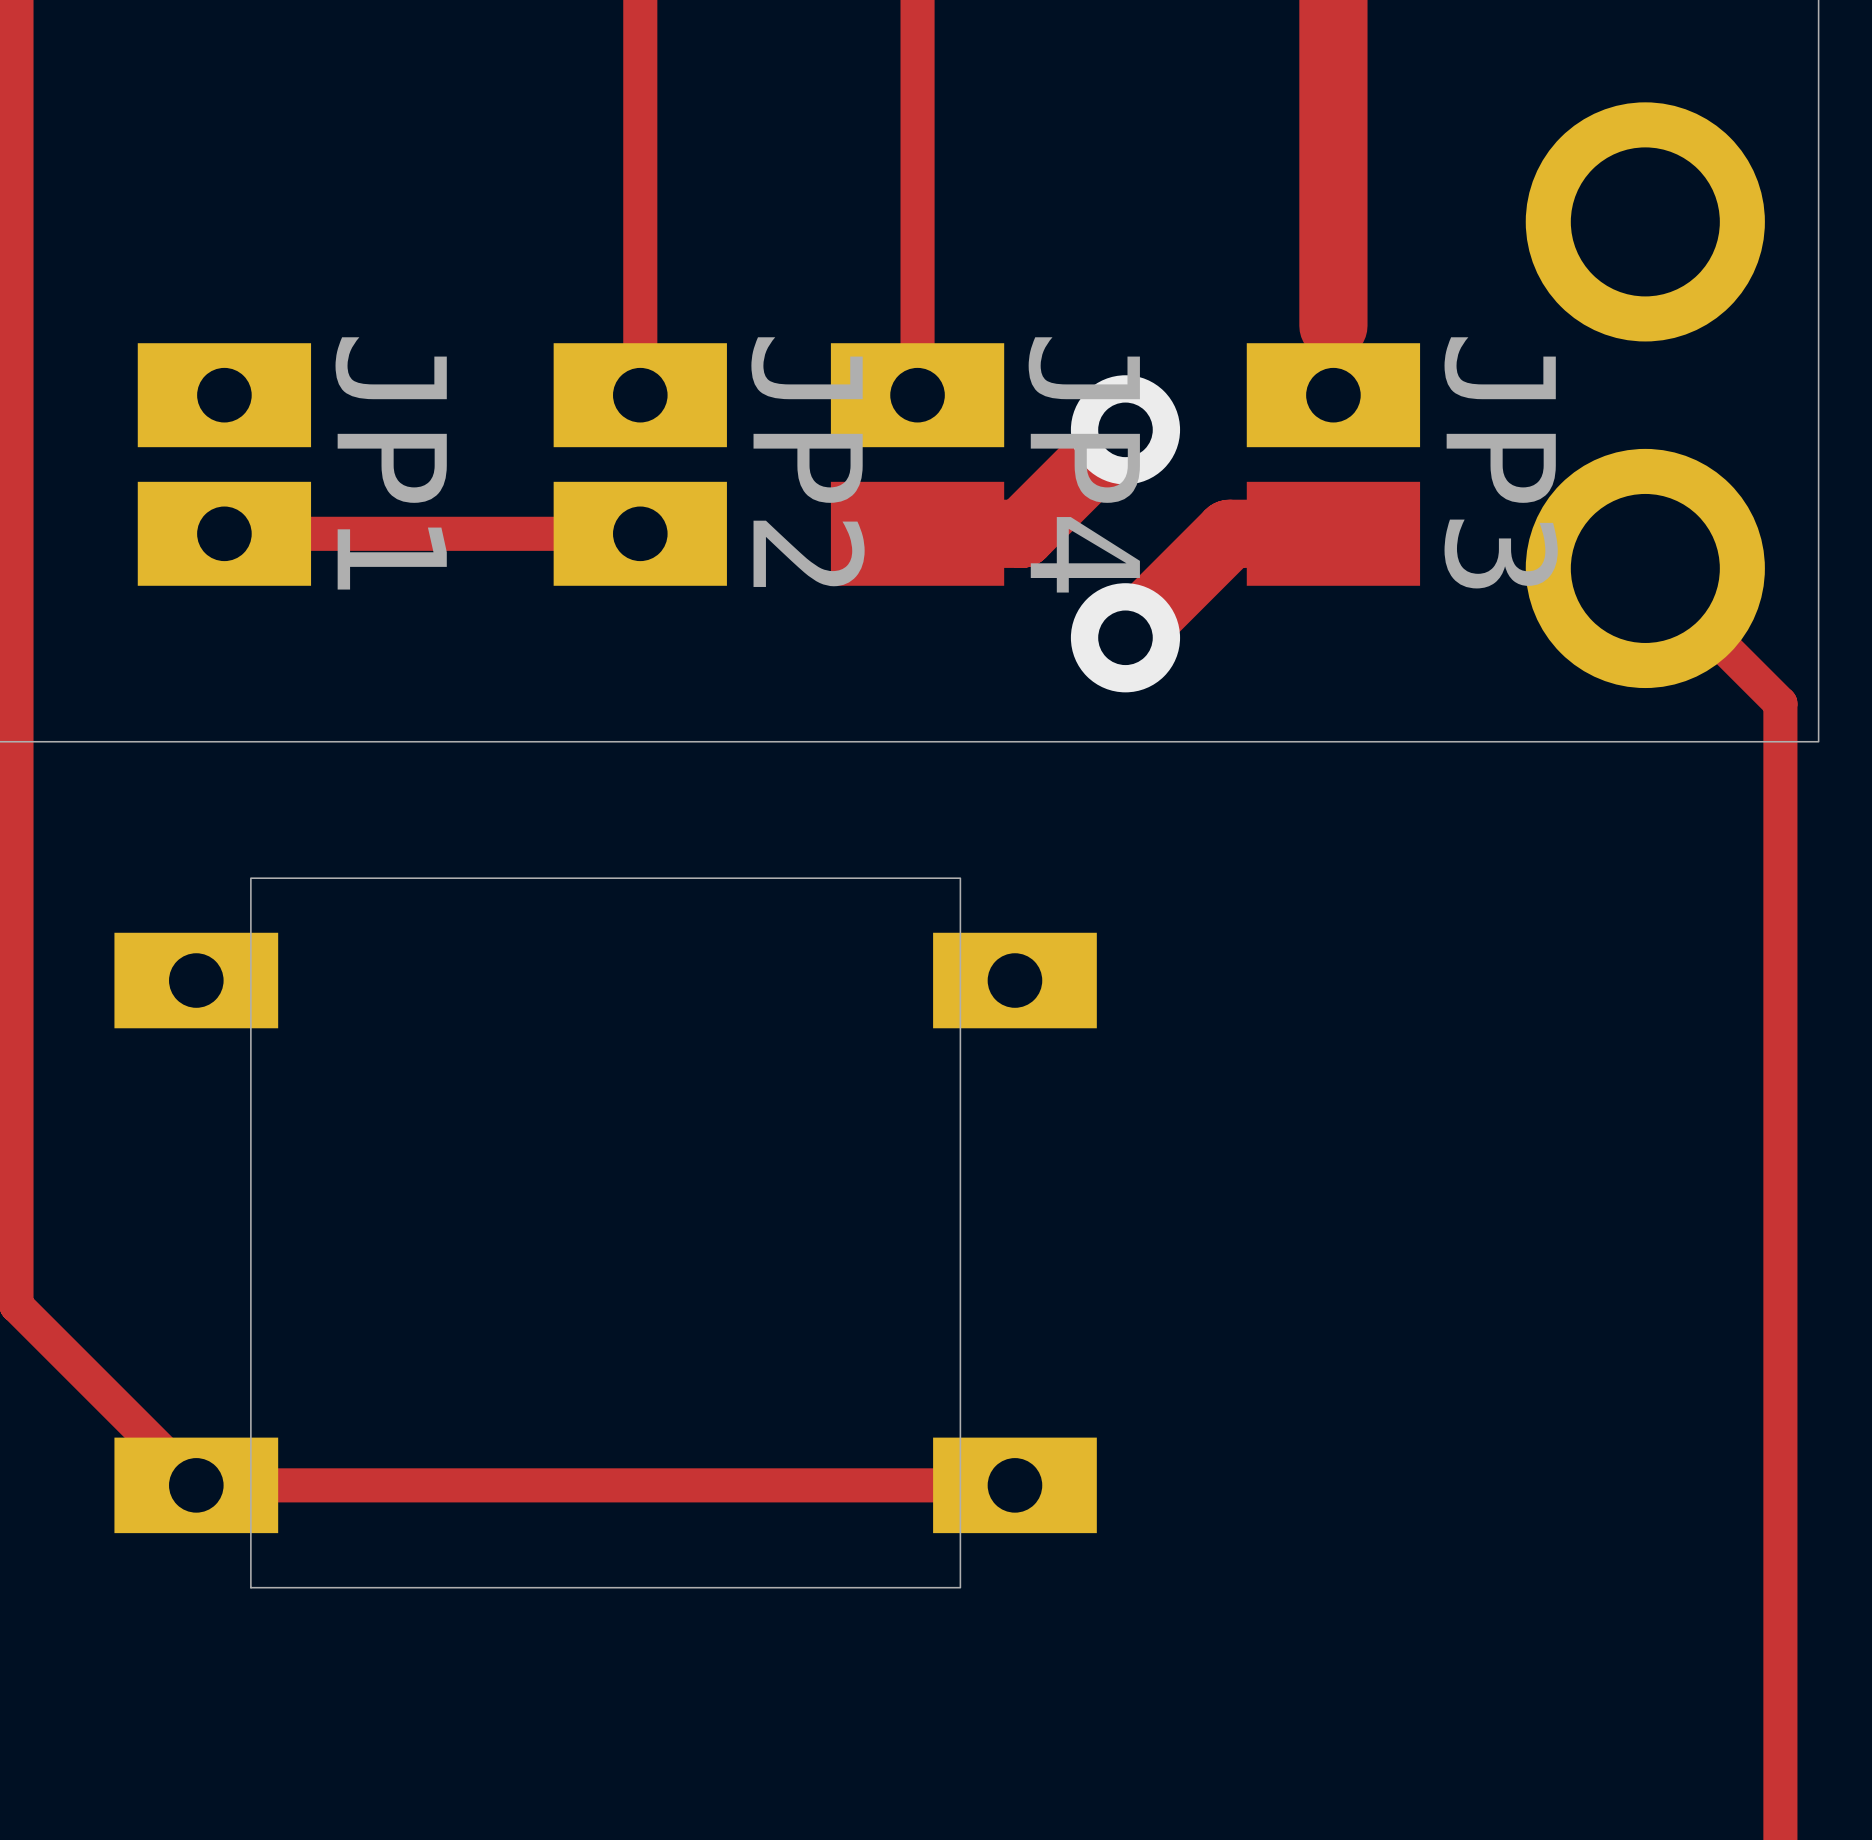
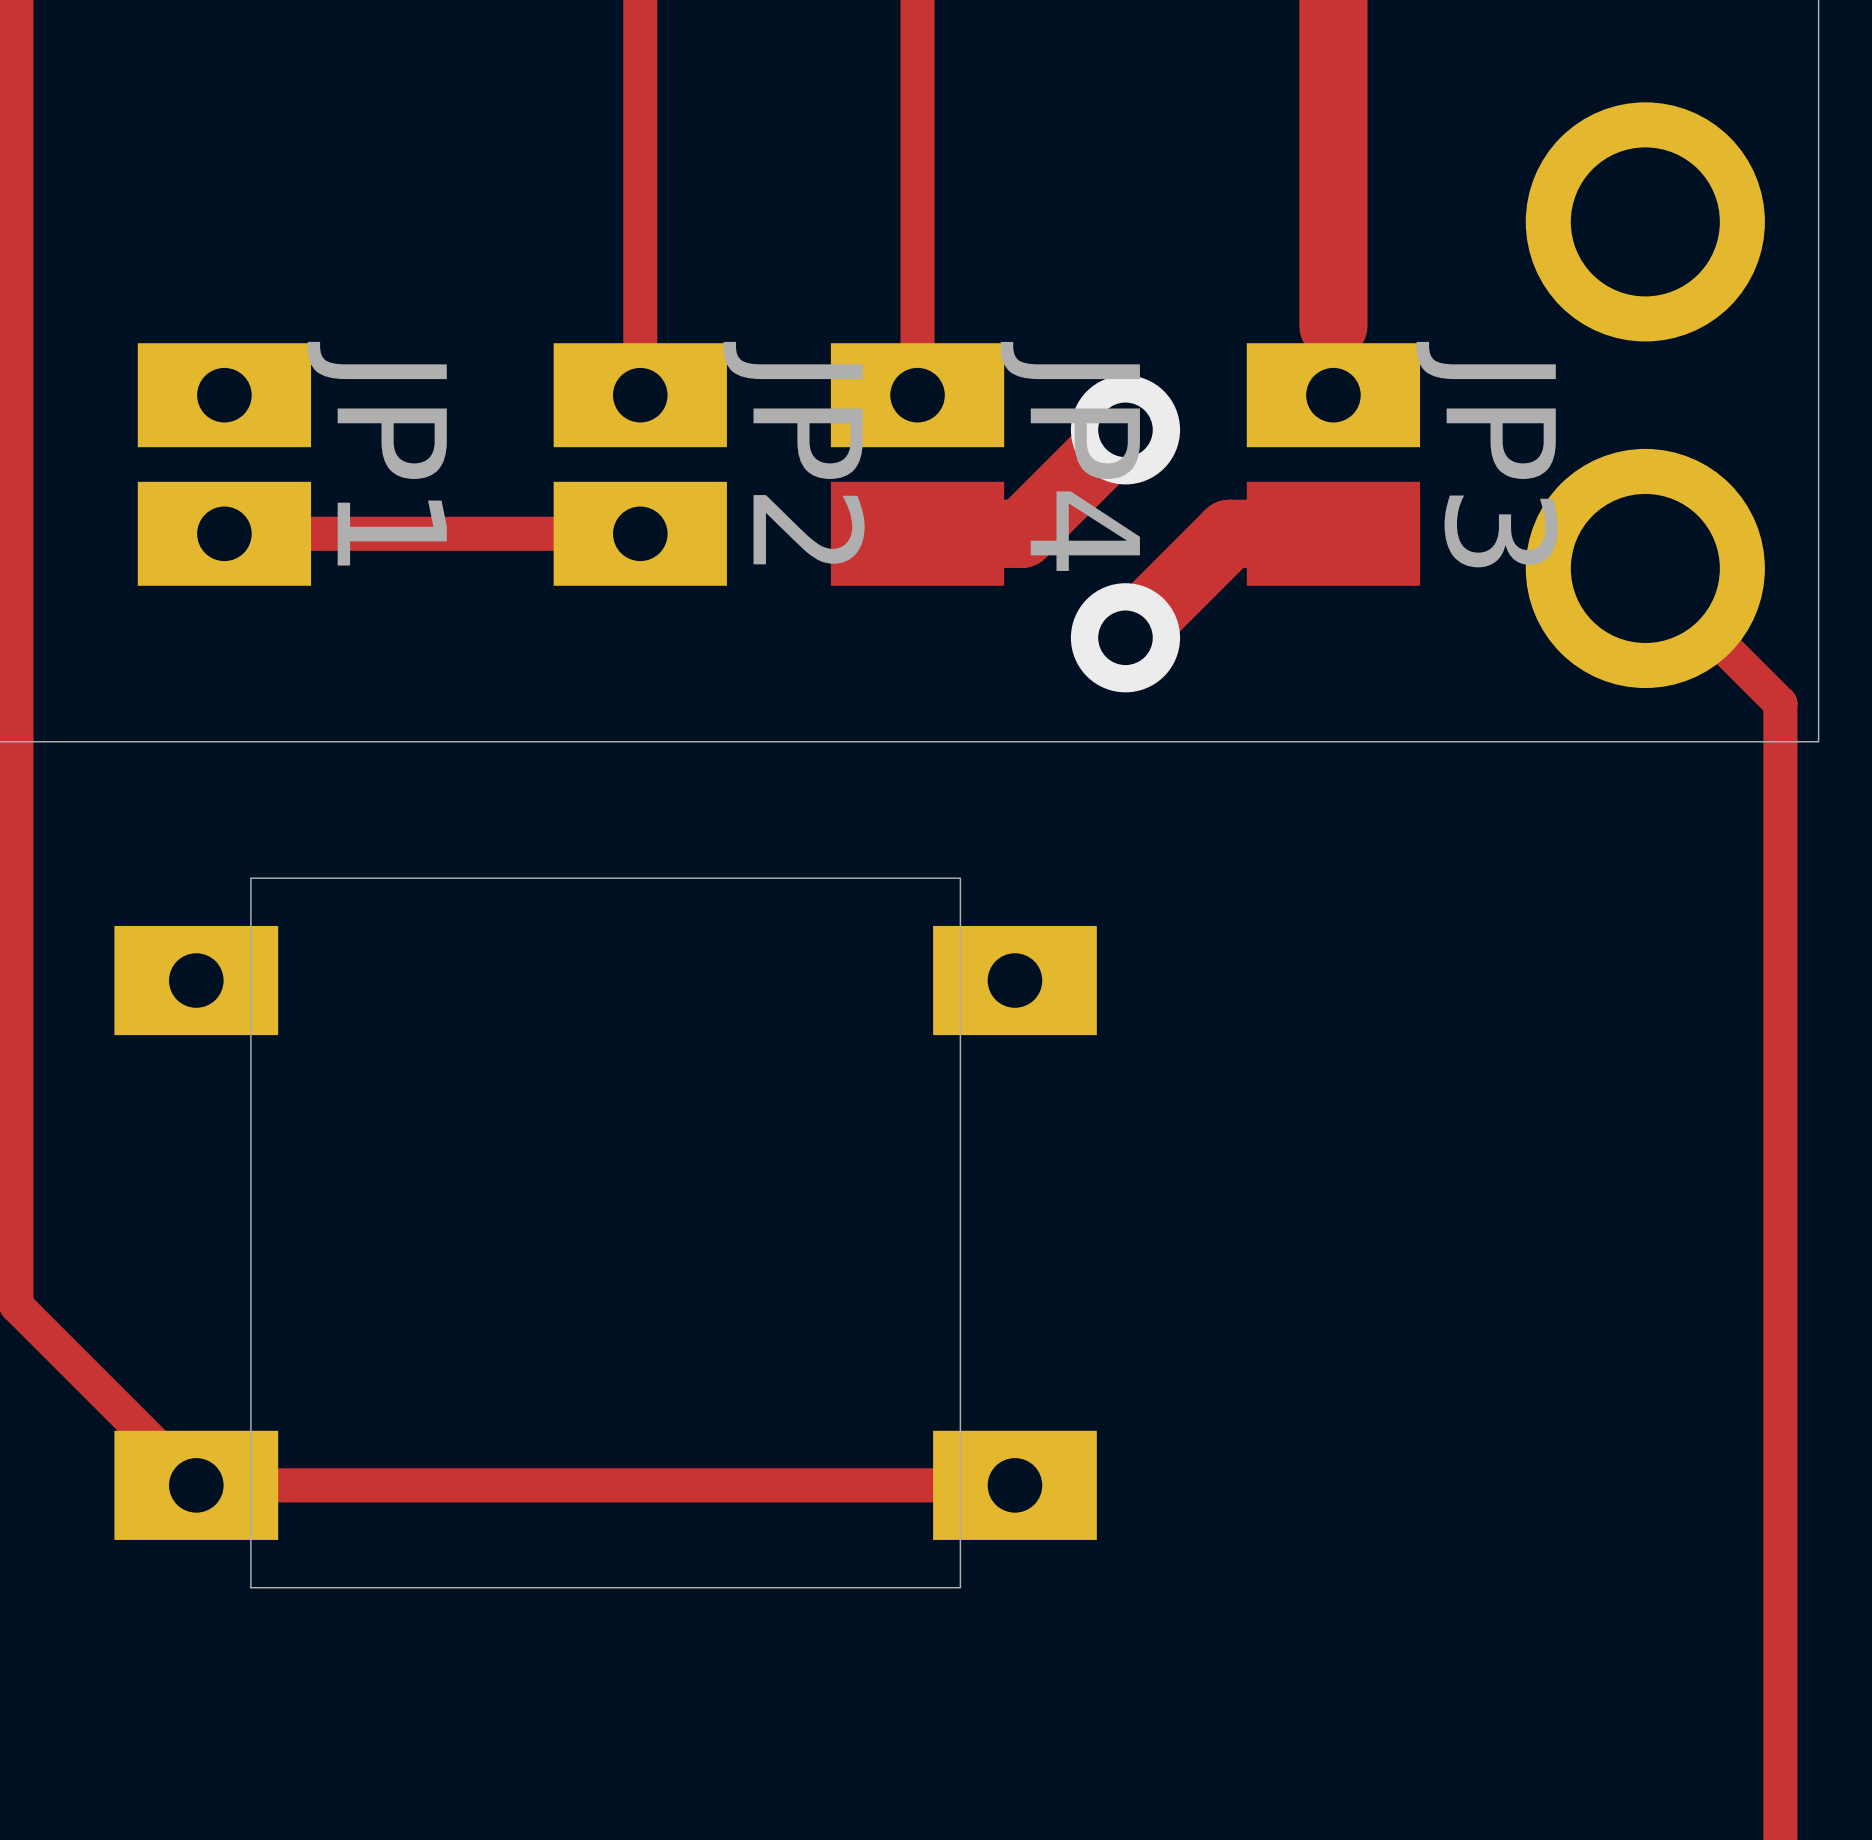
part footprint: [114, 878, 1097, 1588] -> [114, 878, 1097, 1588]

